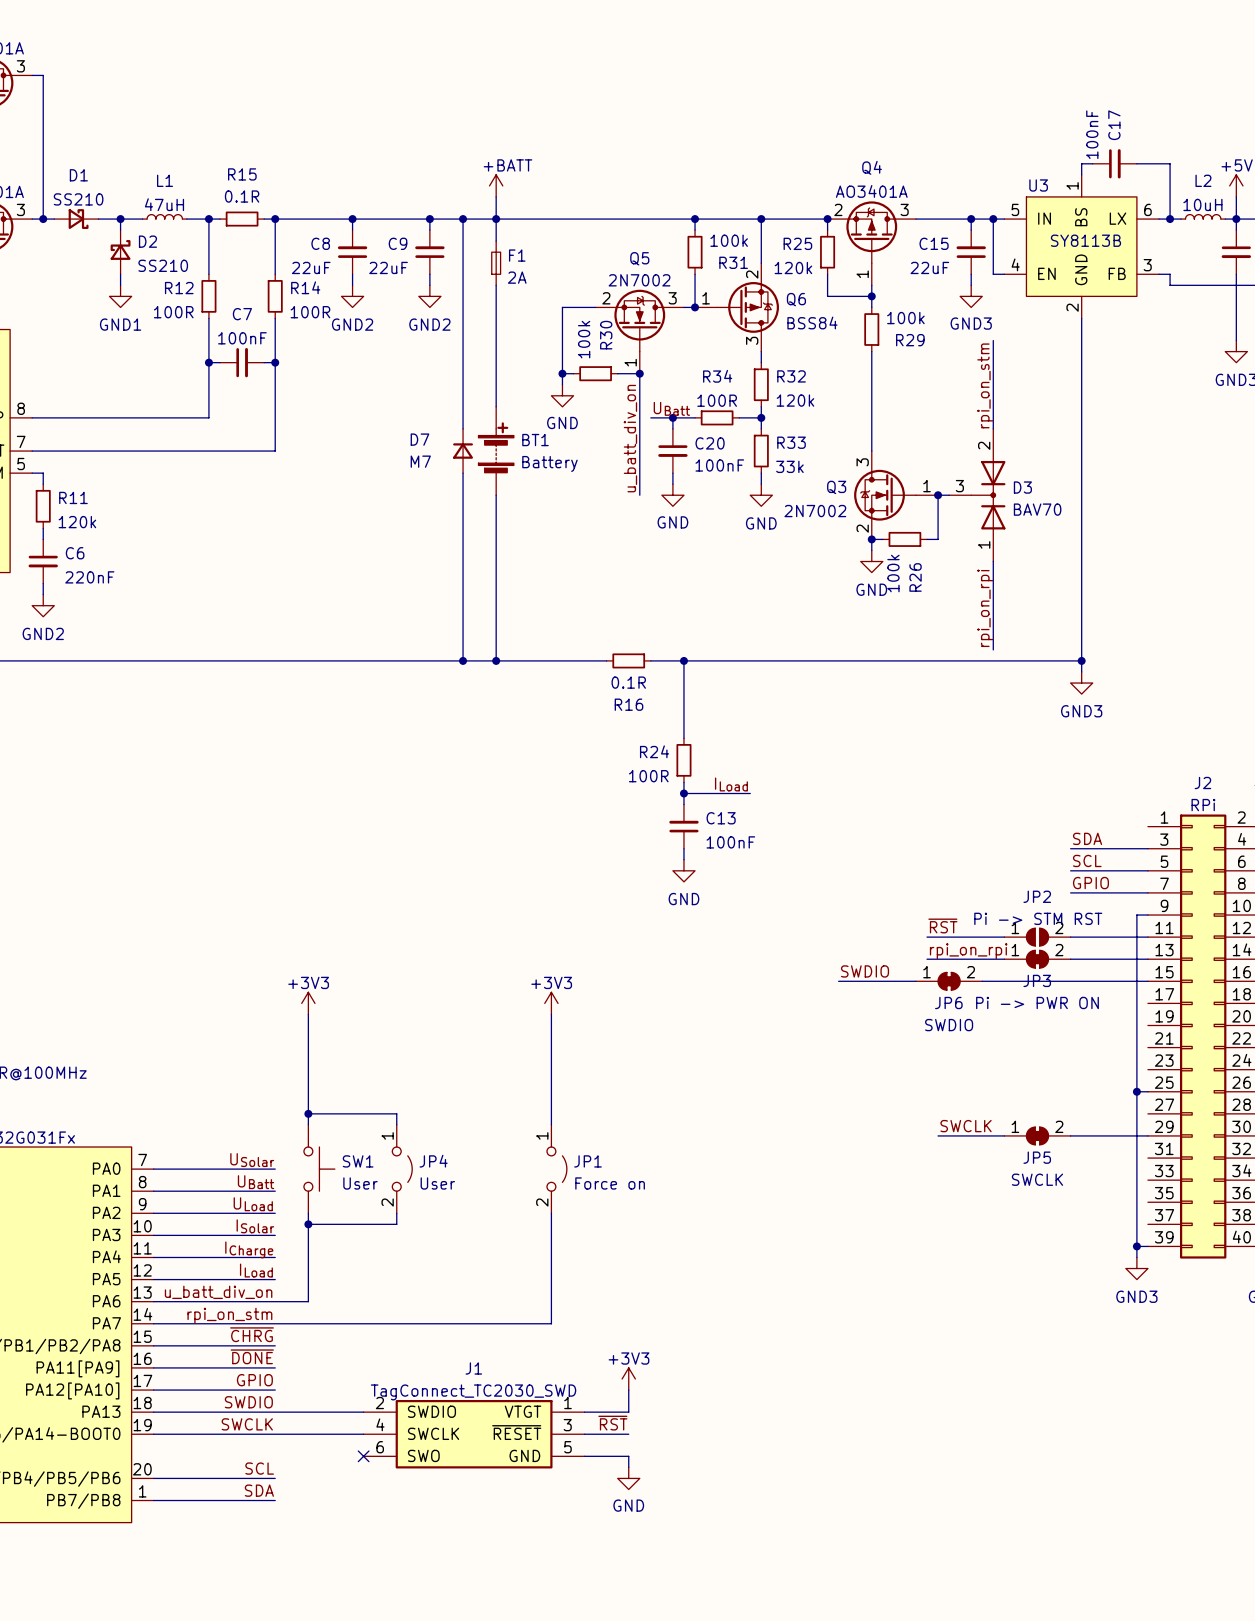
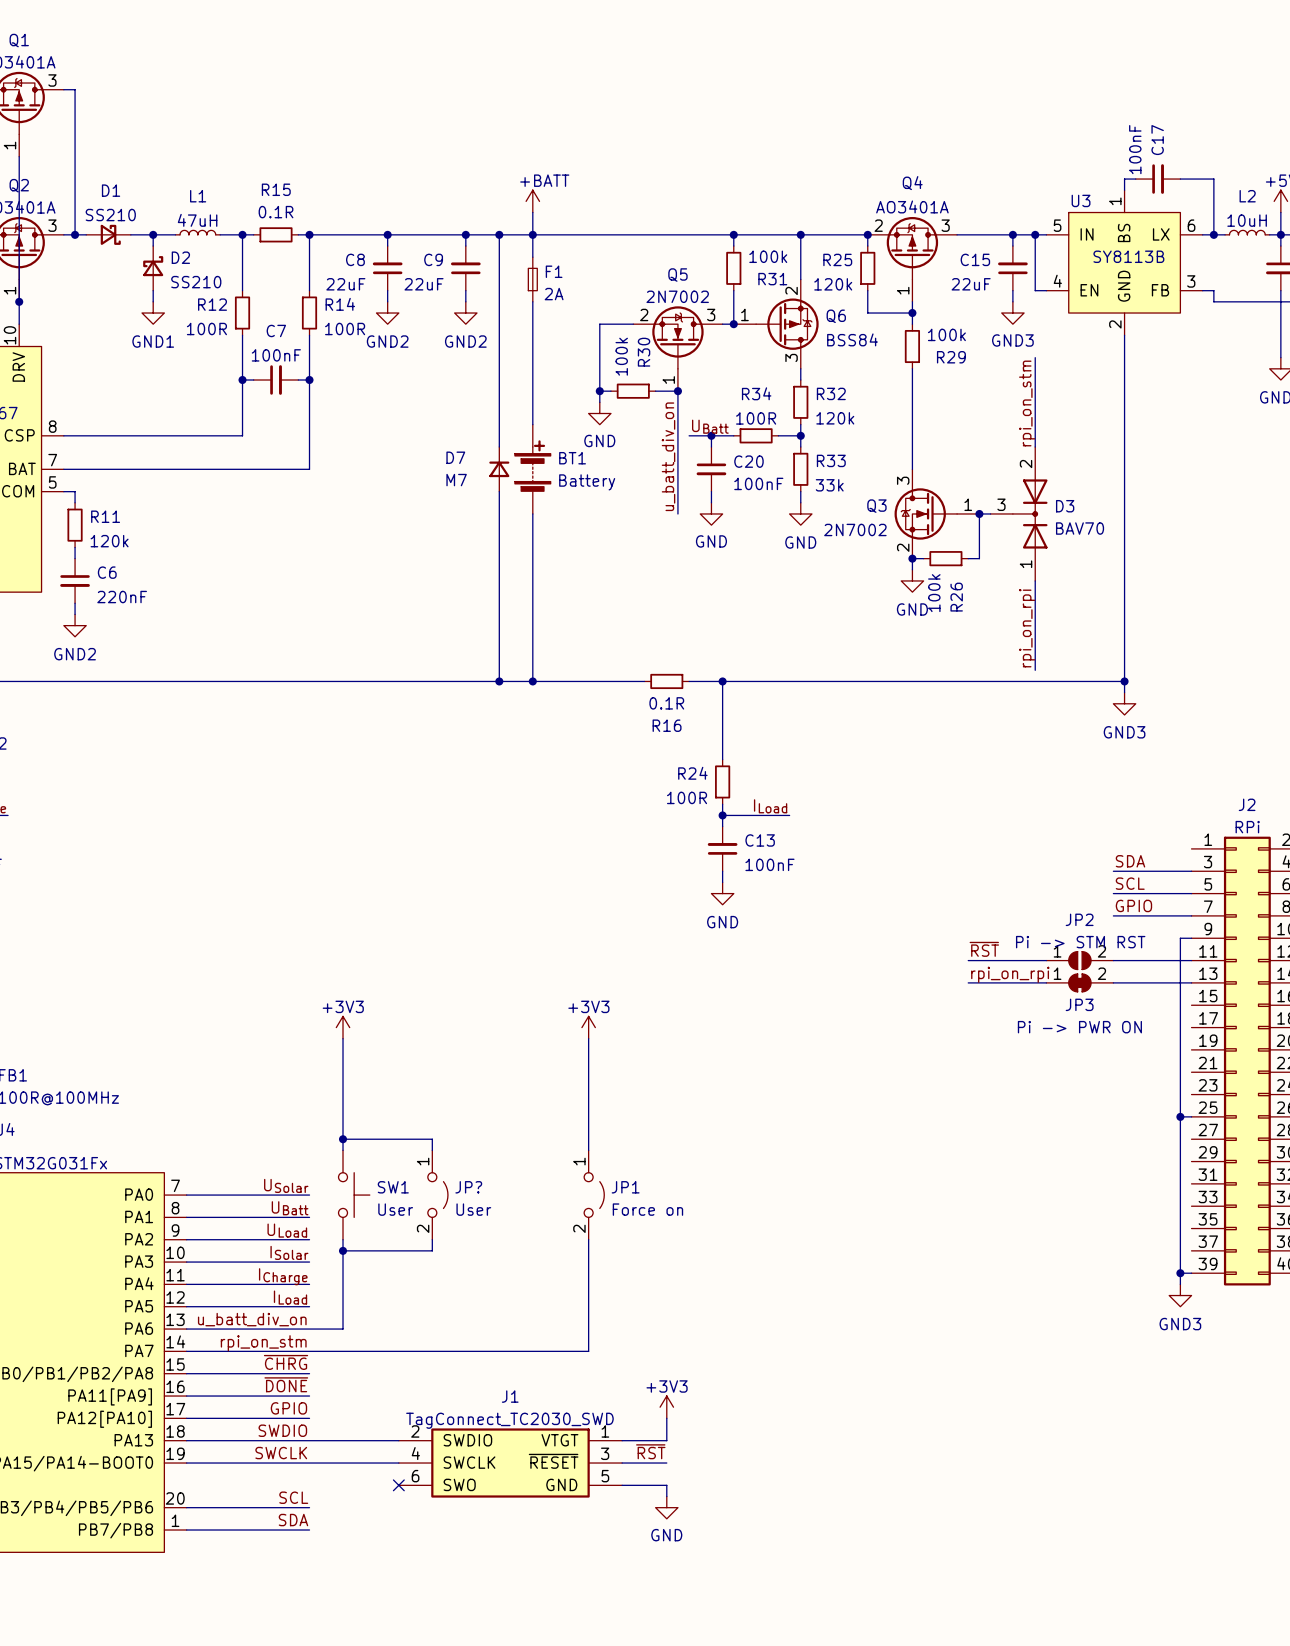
label: SWDIO (865, 971) -> none
wire: (838, 981) (915, 981) -> none
JP6: SWDIO (949, 981) -> none
wire: (982, 981) (1147, 981) -> none
label: SWCLK (966, 1126) -> none
wire: (938, 1135) (1004, 1135) -> none
JP5: SWCLK (1037, 1135) -> none
wire: (1070, 1135) (1147, 1135) -> none
JP4 name: JP4 (433, 1161) -> JP? (468, 1187)

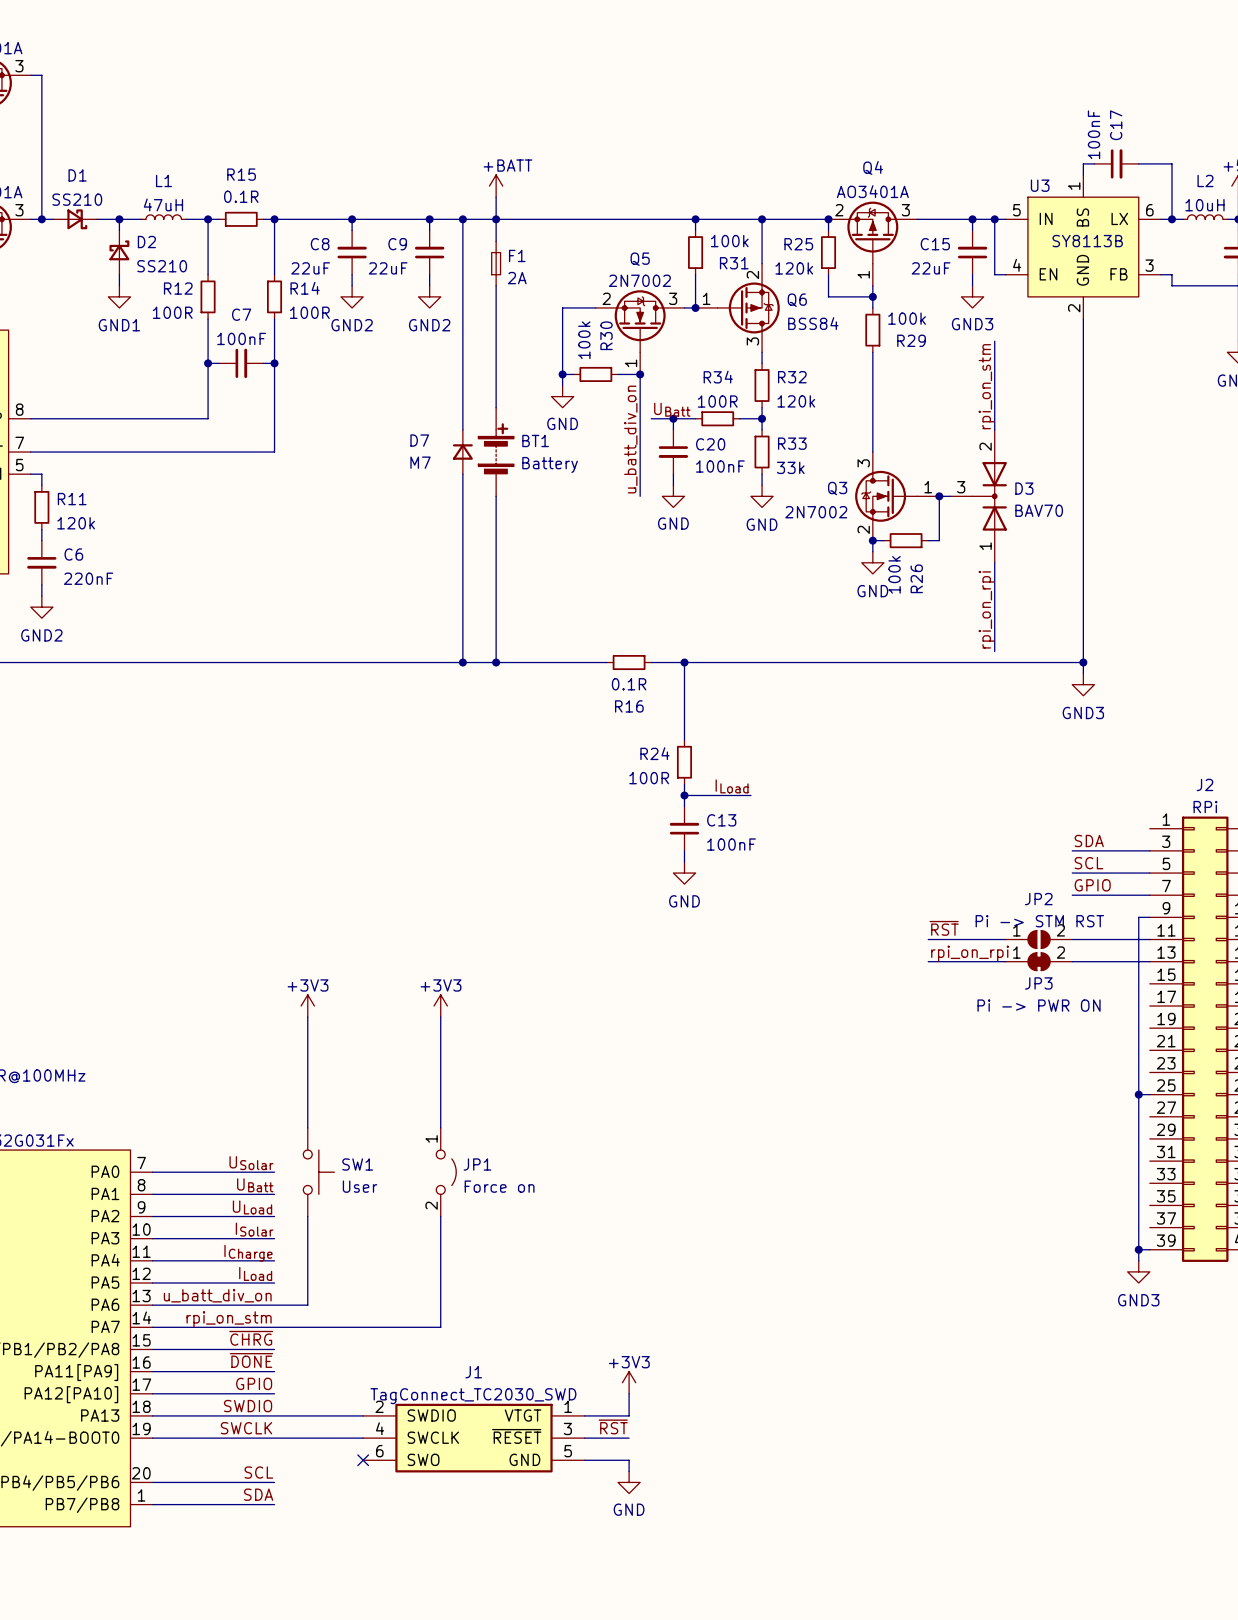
power symbol position: +3V3 (588, 1027) -> +3V3 (440, 1006)
wire: (588, 1038) (588, 1150) -> (440, 1017) (440, 1127)
wire: (343, 1139) (432, 1139) (432, 1150) -> none
junction: (343, 1139) -> none
JP?: User (437, 1195) -> none
JP1 position: (594, 1195) -> (446, 1172)
wire: (432, 1239) (432, 1250) (343, 1250) -> none
wire: (588, 1239) (588, 1351) (476, 1351) -> (440, 1216) (440, 1327)
junction: (343, 1250) -> none

